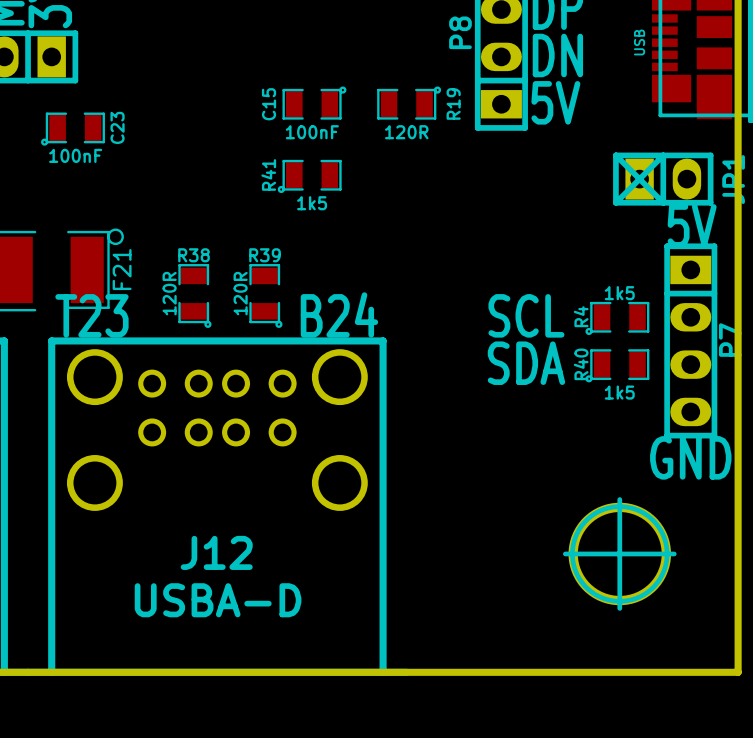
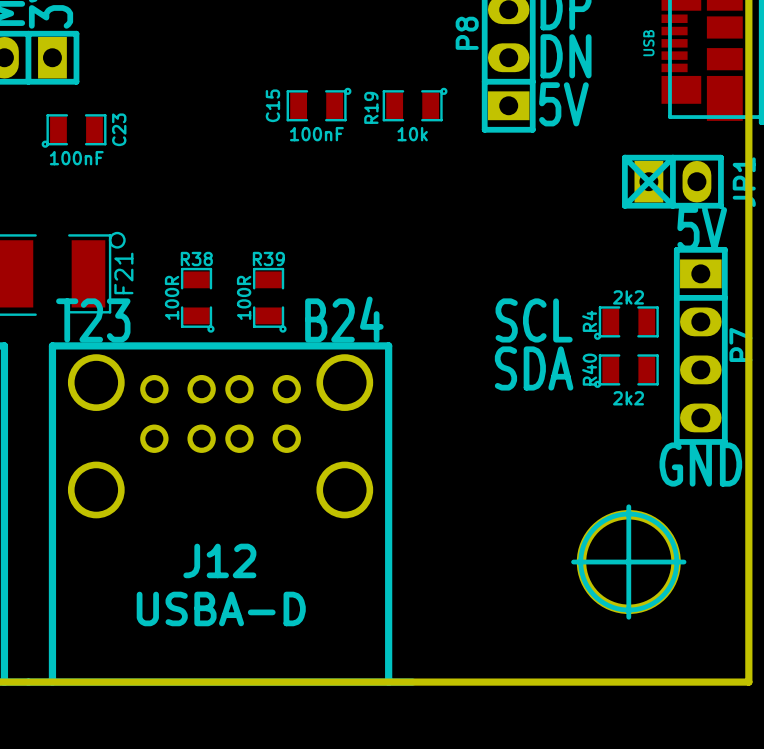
R19 name position: R19 (453, 103) -> R19 (371, 107)
R19 value: 120R (406, 132) -> 10k (412, 134)
R41: 1k5 (309, 176) -> none
R38 value: 120R (169, 293) -> 100R (172, 297)
R39 value: 120R (240, 293) -> 100R (244, 297)
R4 value: 1k5 (619, 293) -> 2k2 (628, 297)
R40 value: 1k5 (619, 392) -> 2k2 (628, 398)

